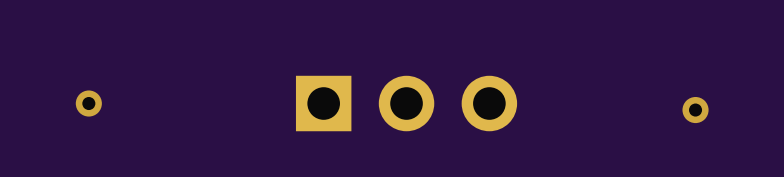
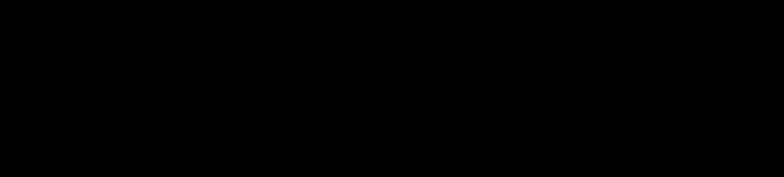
via: (88, 103) -> none
part: (406, 103) -> none
via: (695, 110) -> none

